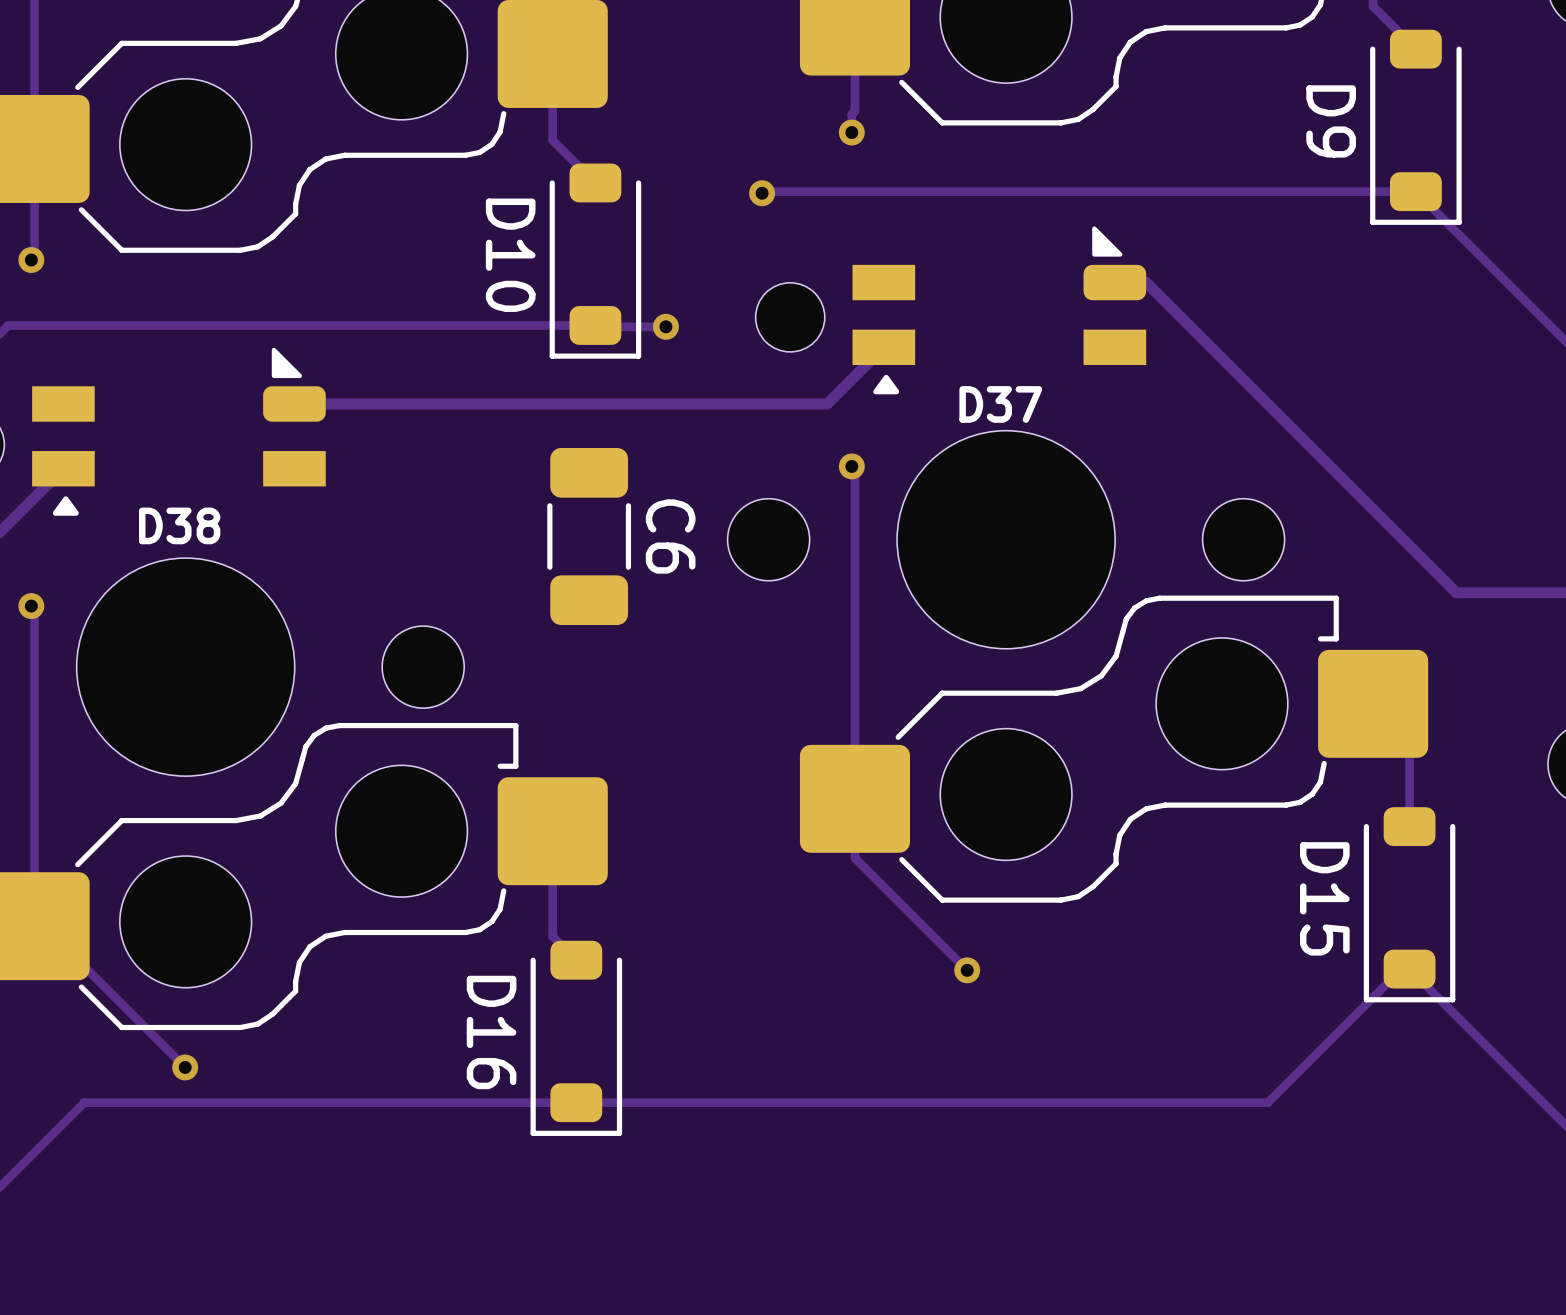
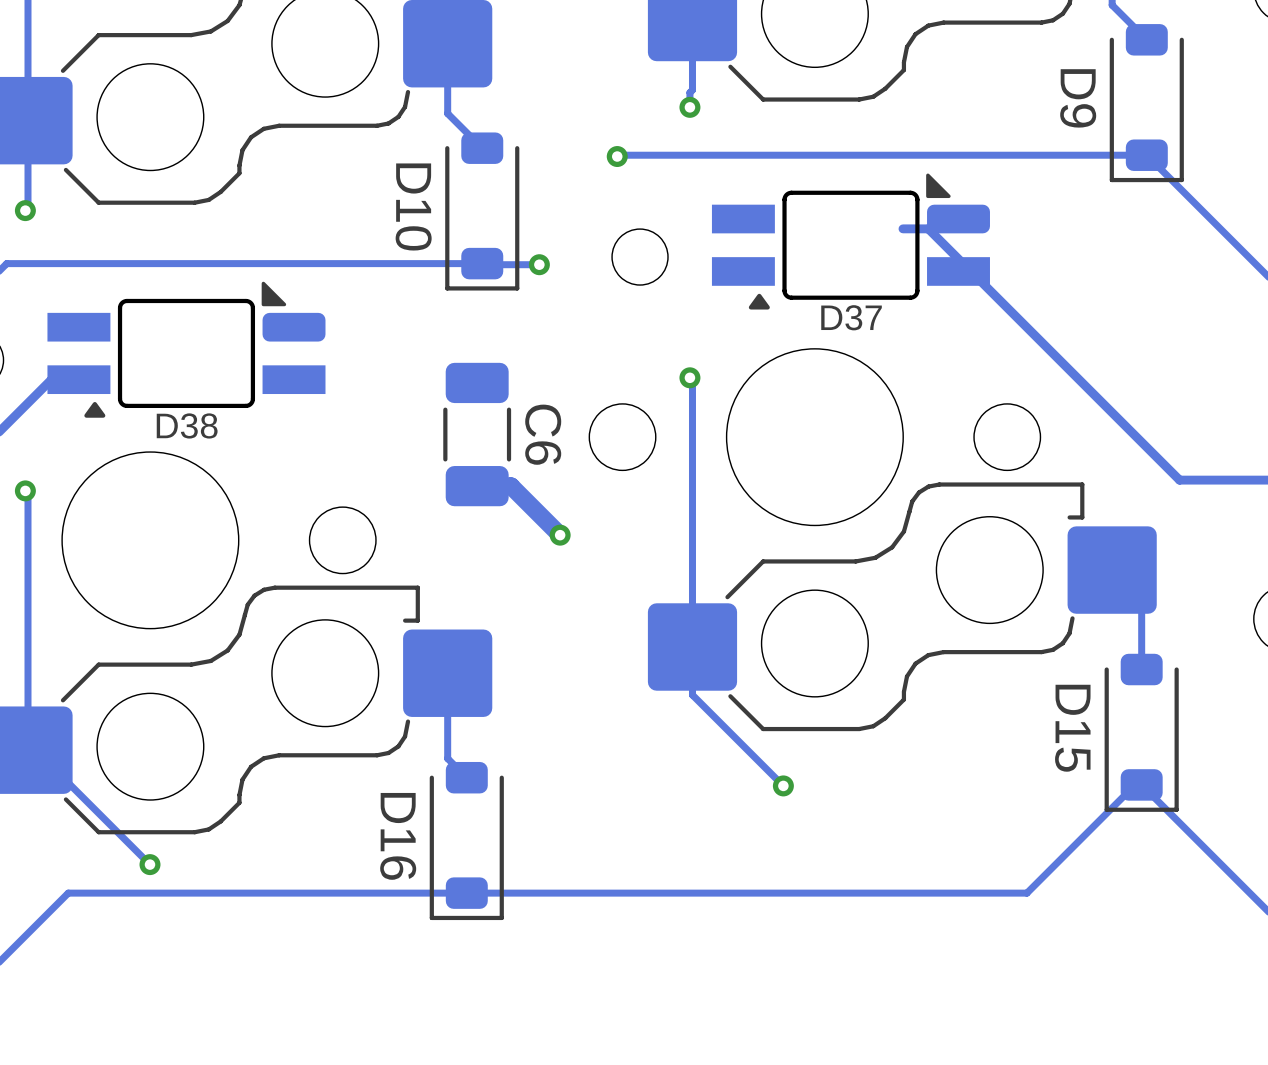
D37 footprint: [852, 226, 1147, 395] -> [711, 173, 990, 310]
D38 footprint: [32, 347, 326, 516] -> [47, 281, 326, 418]
track: (883, 347) (827, 403) (294, 403) -> none
track: none -> (477, 486) (511, 486) (560, 535)
via: none -> (560, 535)

